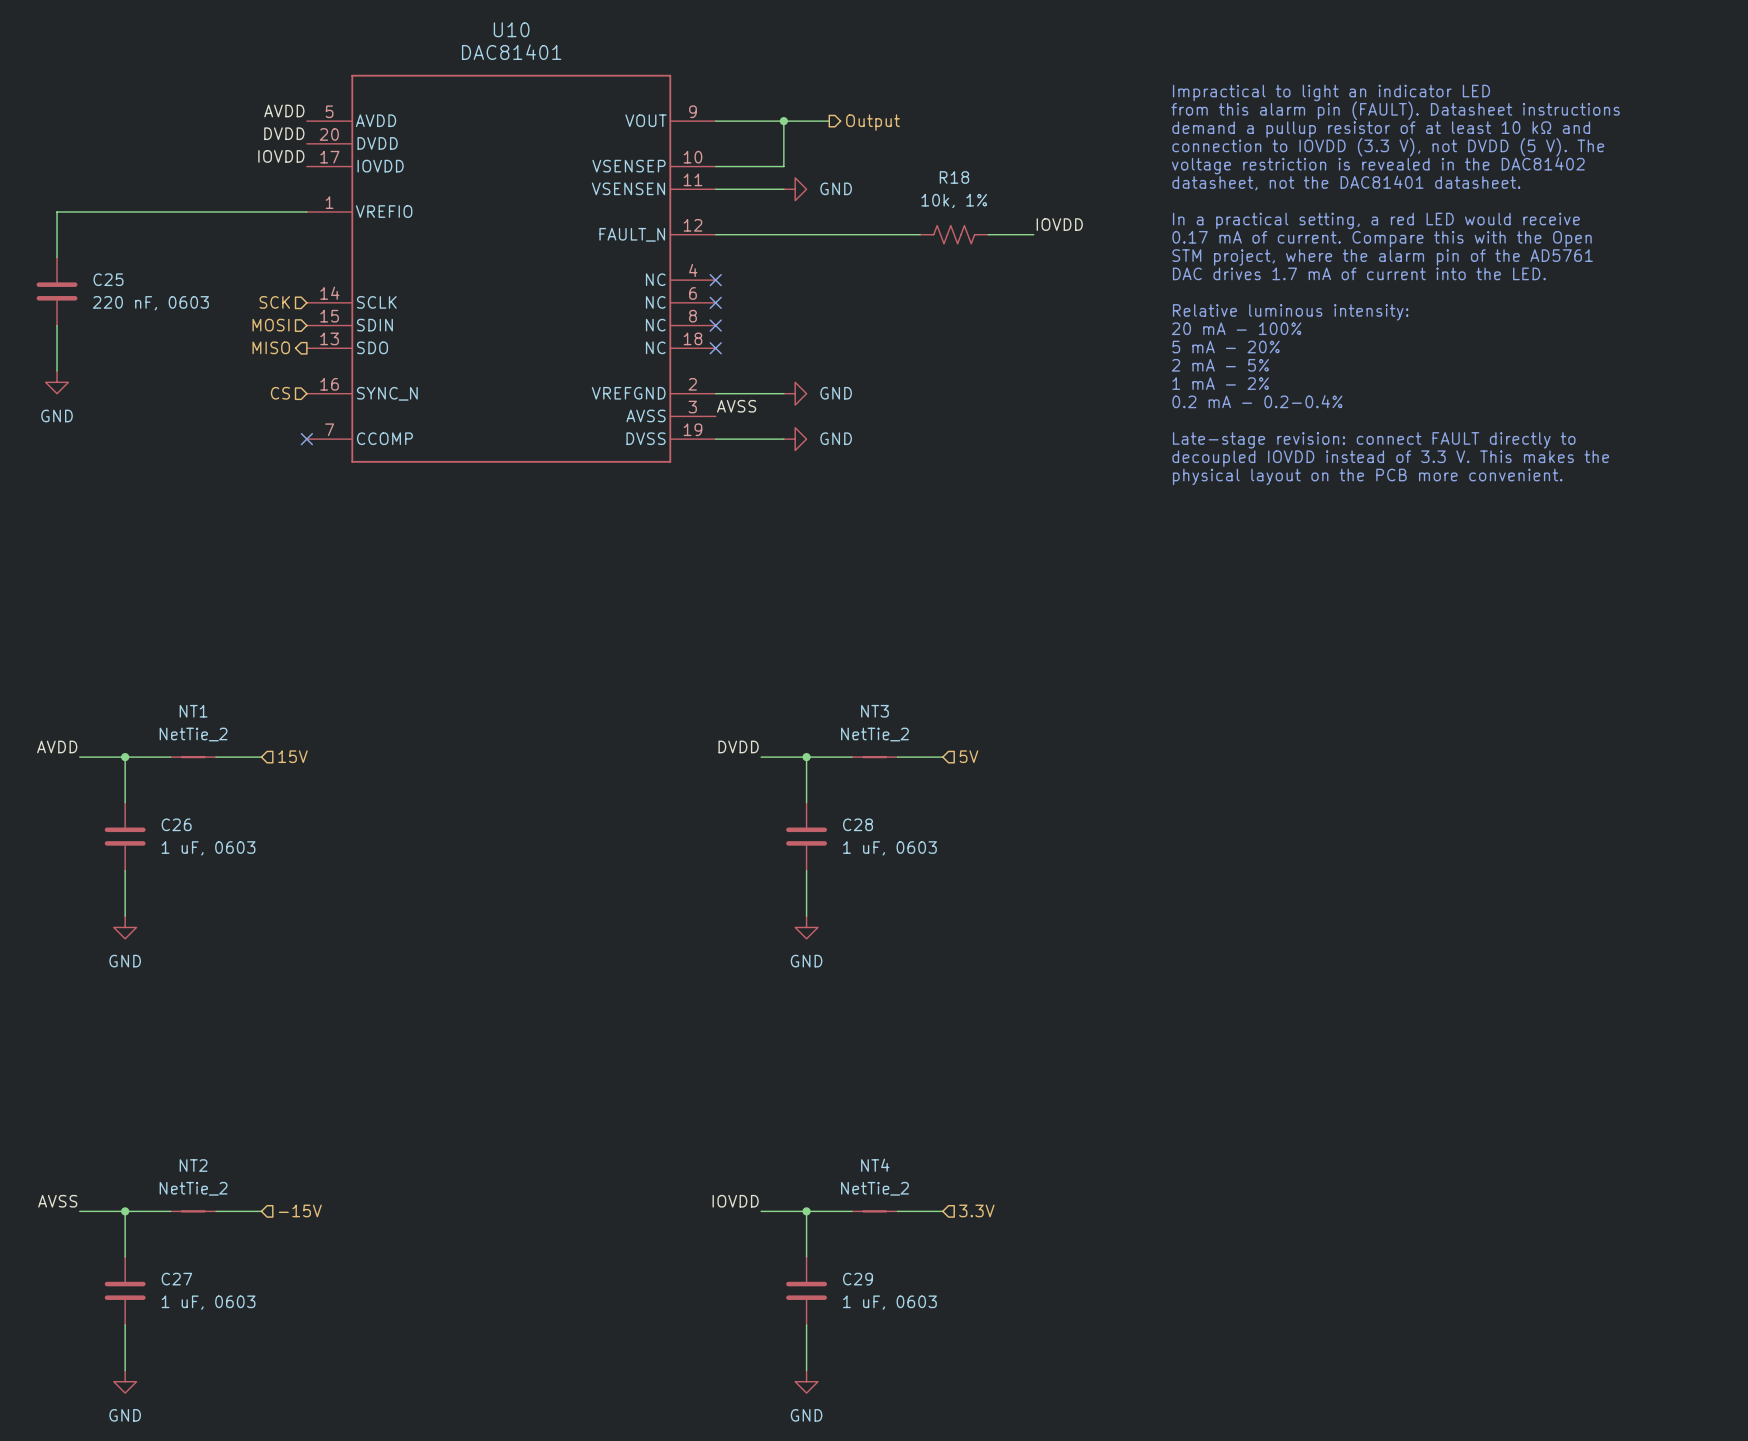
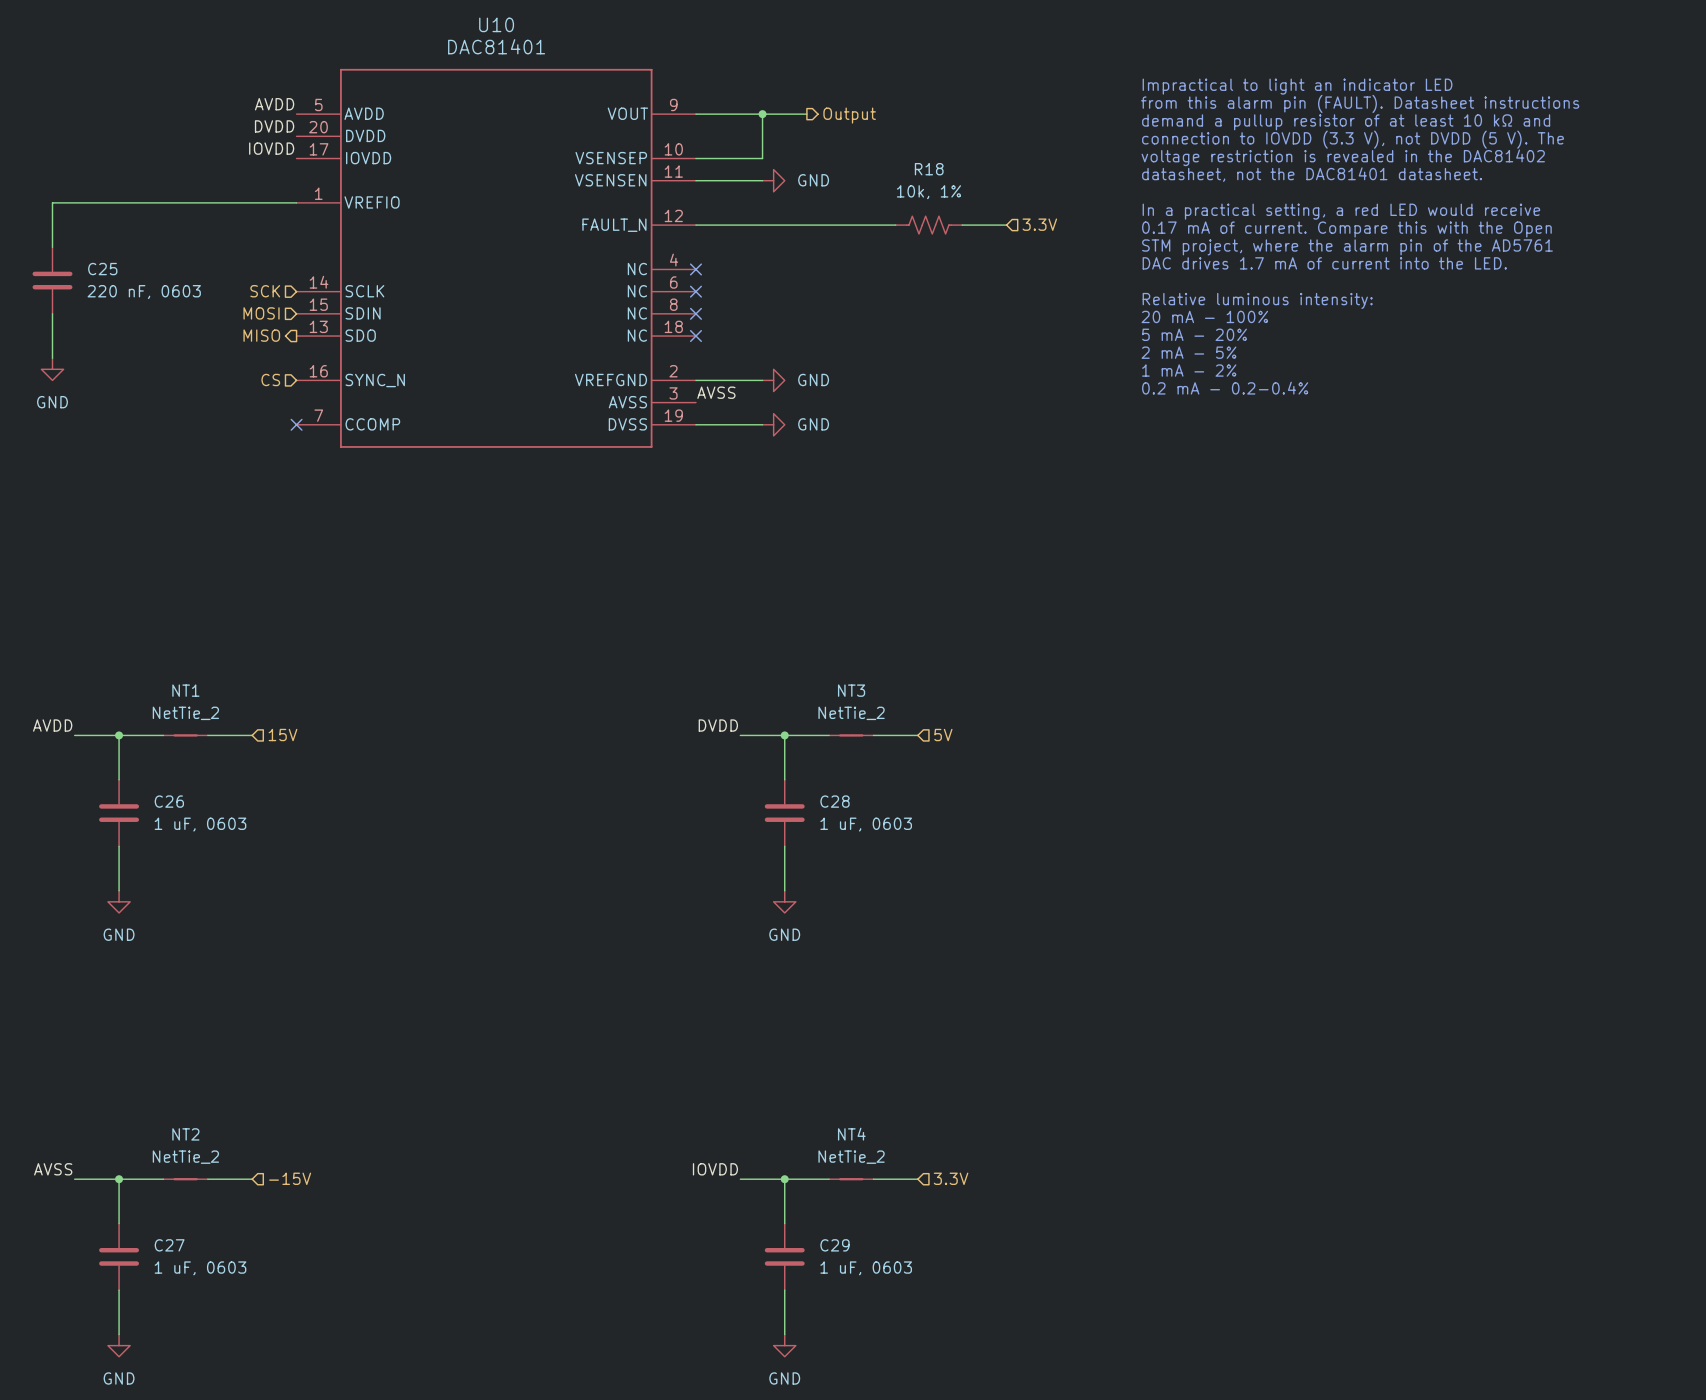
label: IOVDD (1059, 224) -> none
hierarchical label: none -> 3.3V (1039, 224)
text: Late-stage revision: connect FAULT directly to (1374, 440) -> none
text: decoupled IOVDD instead of 3.3 V. This makes the (1390, 458) -> none
text: physical layout on the PCB more convenient. (1367, 476) -> none

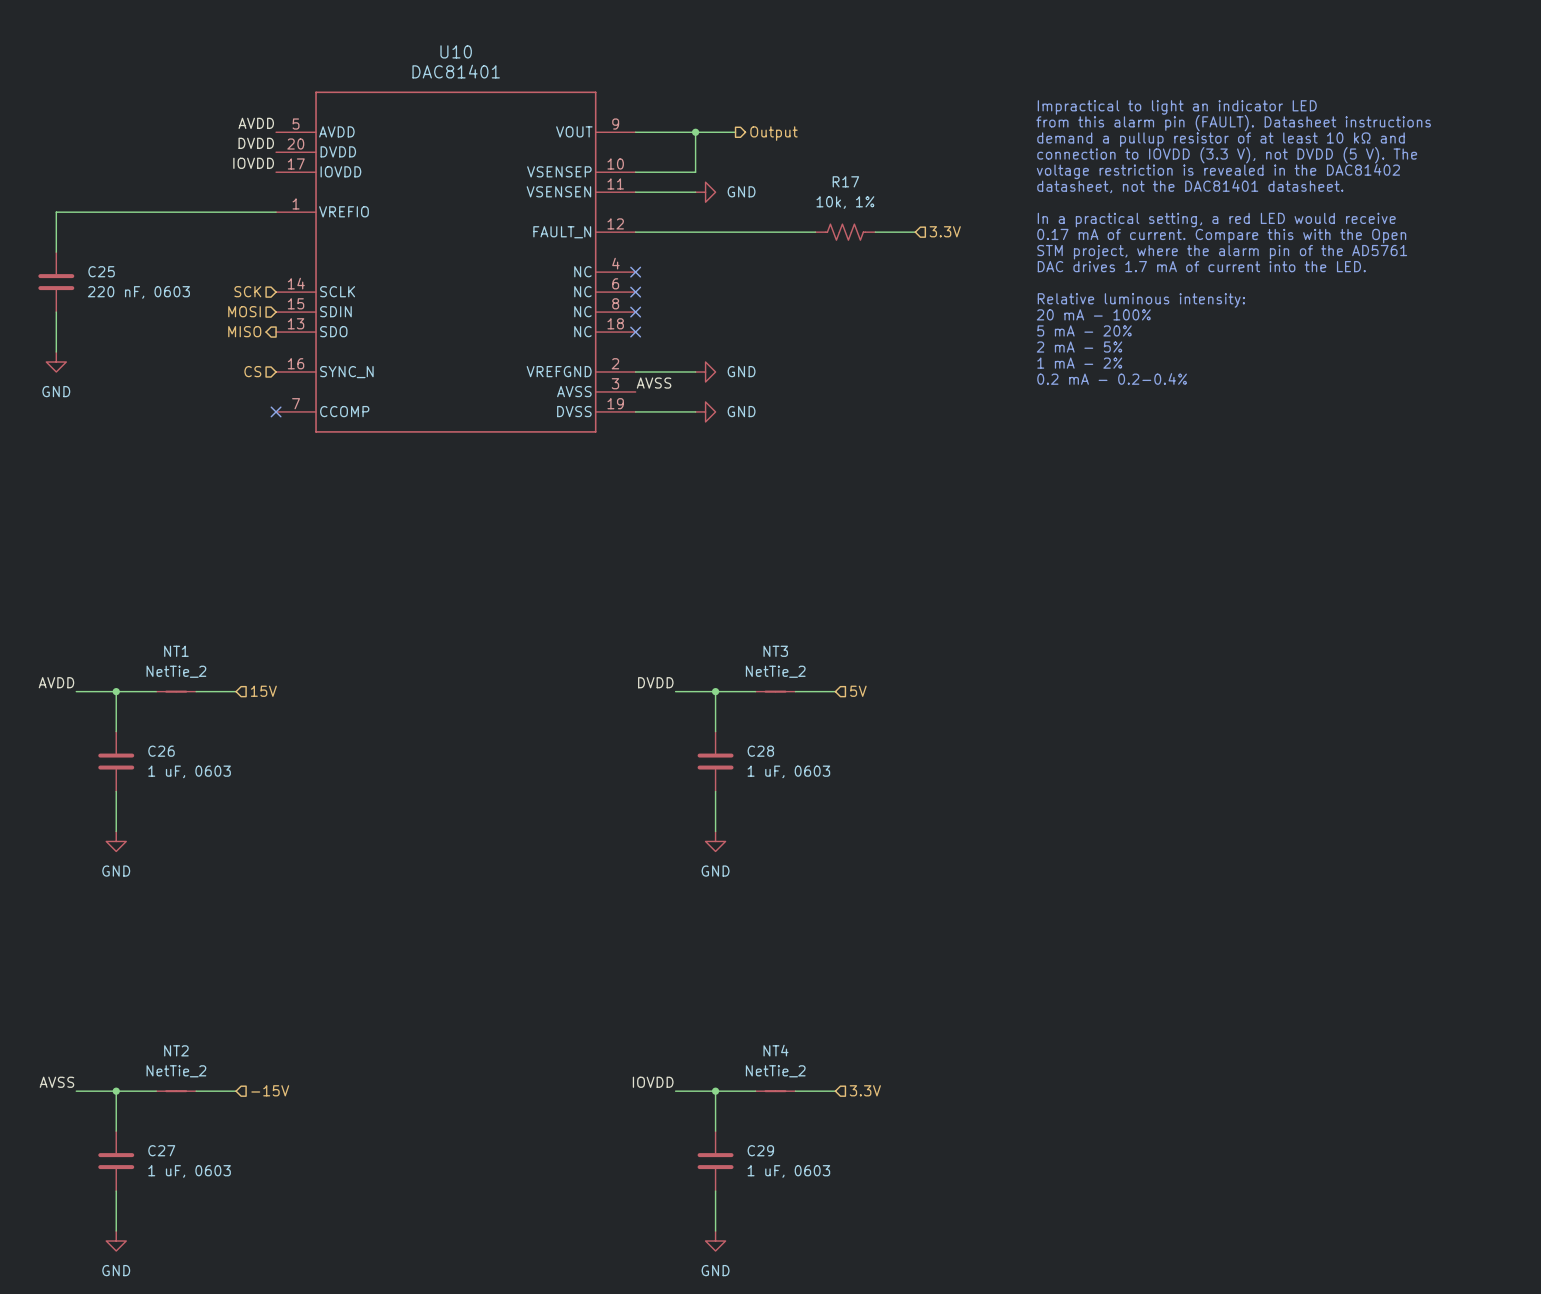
R18 name: R18 (929, 169) -> R17 (845, 181)

